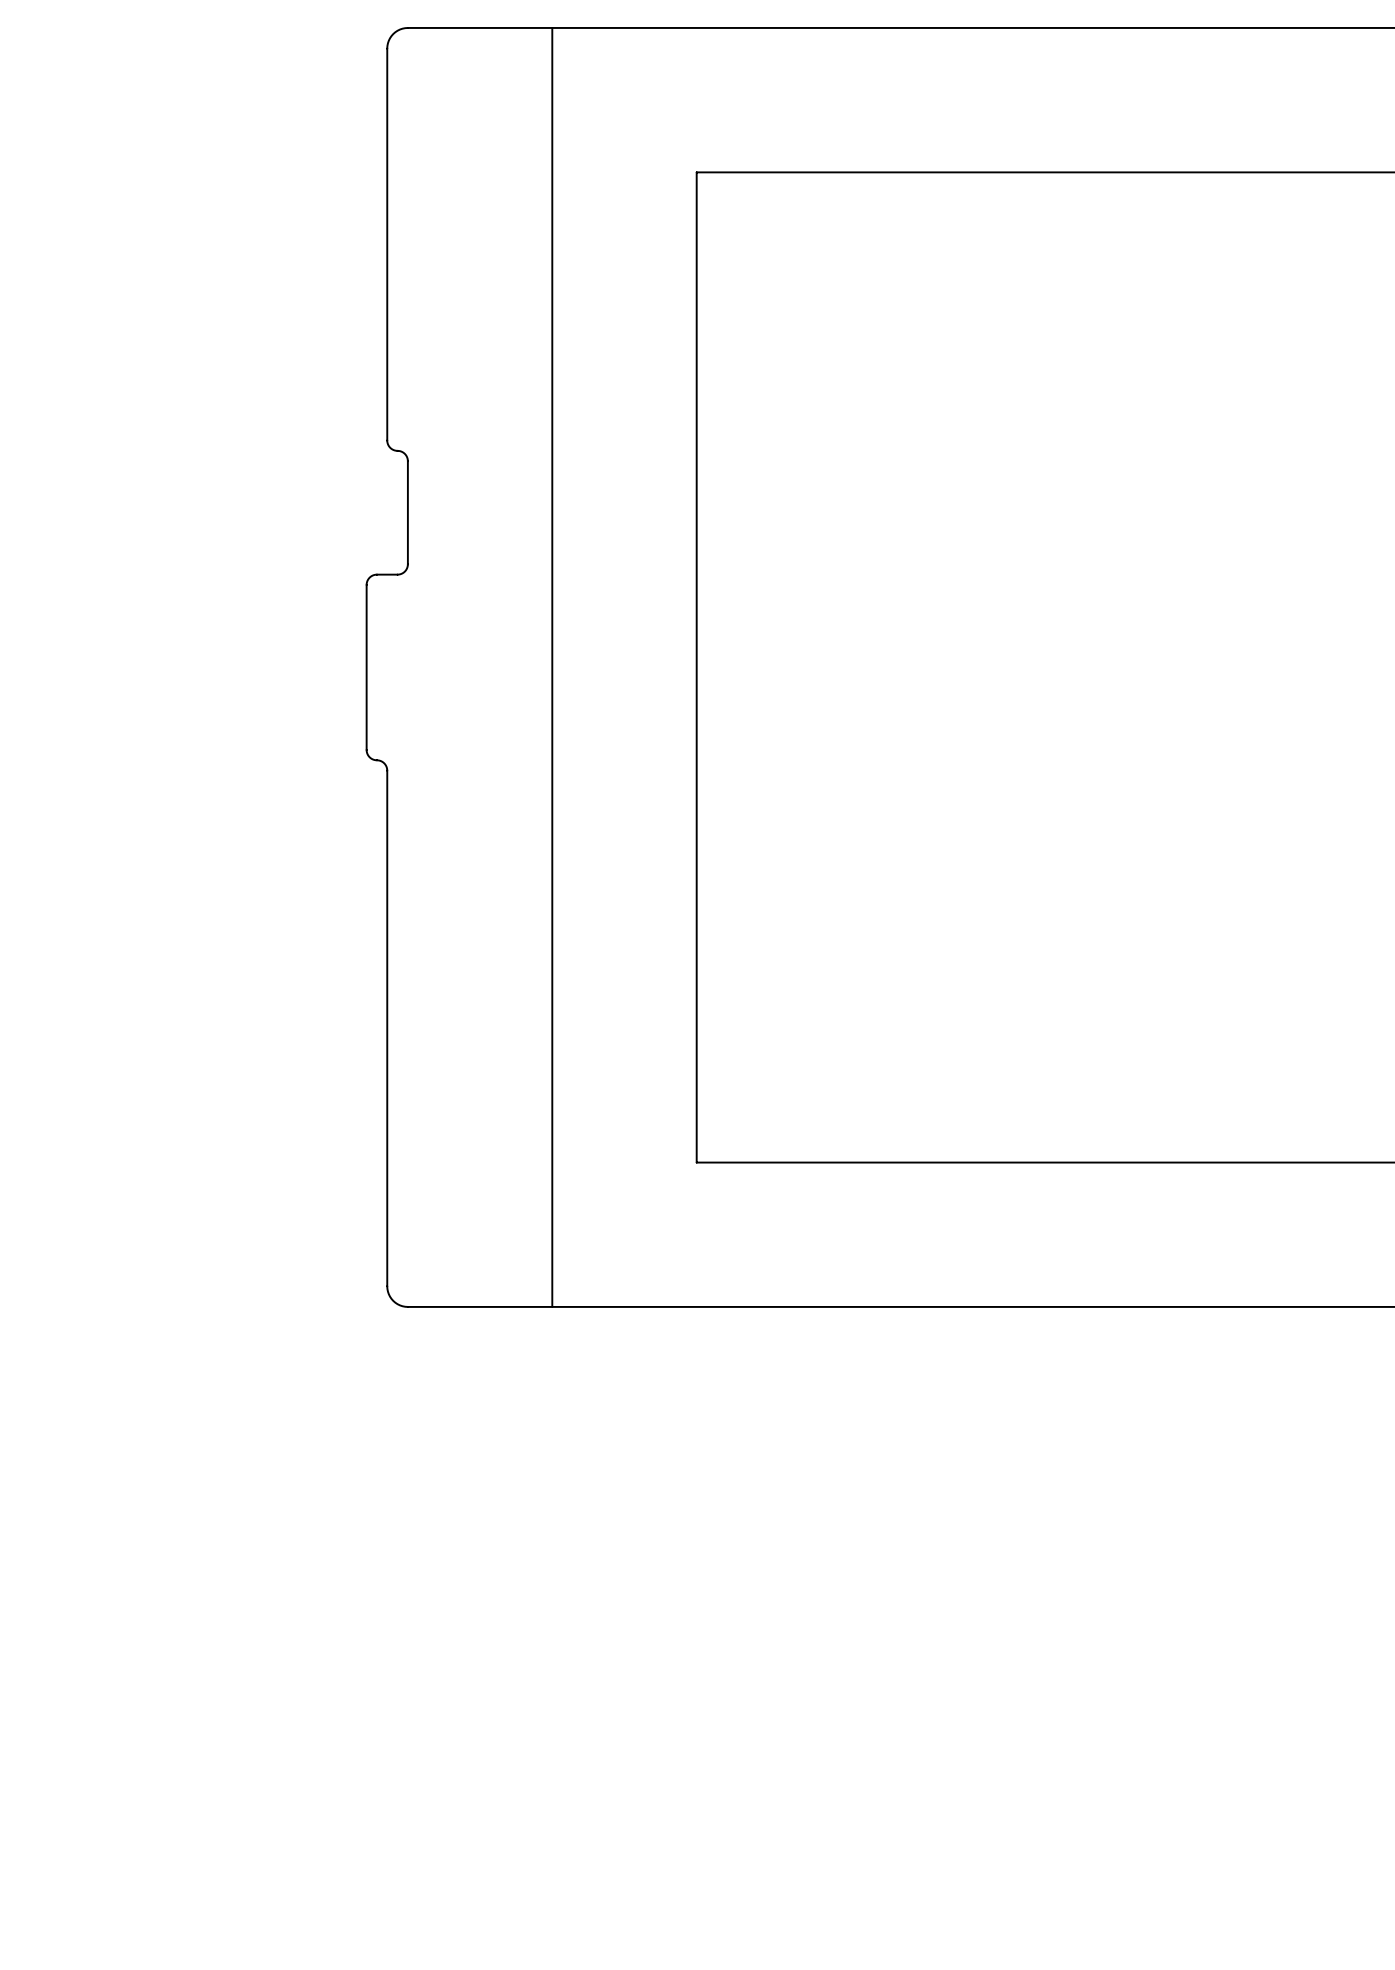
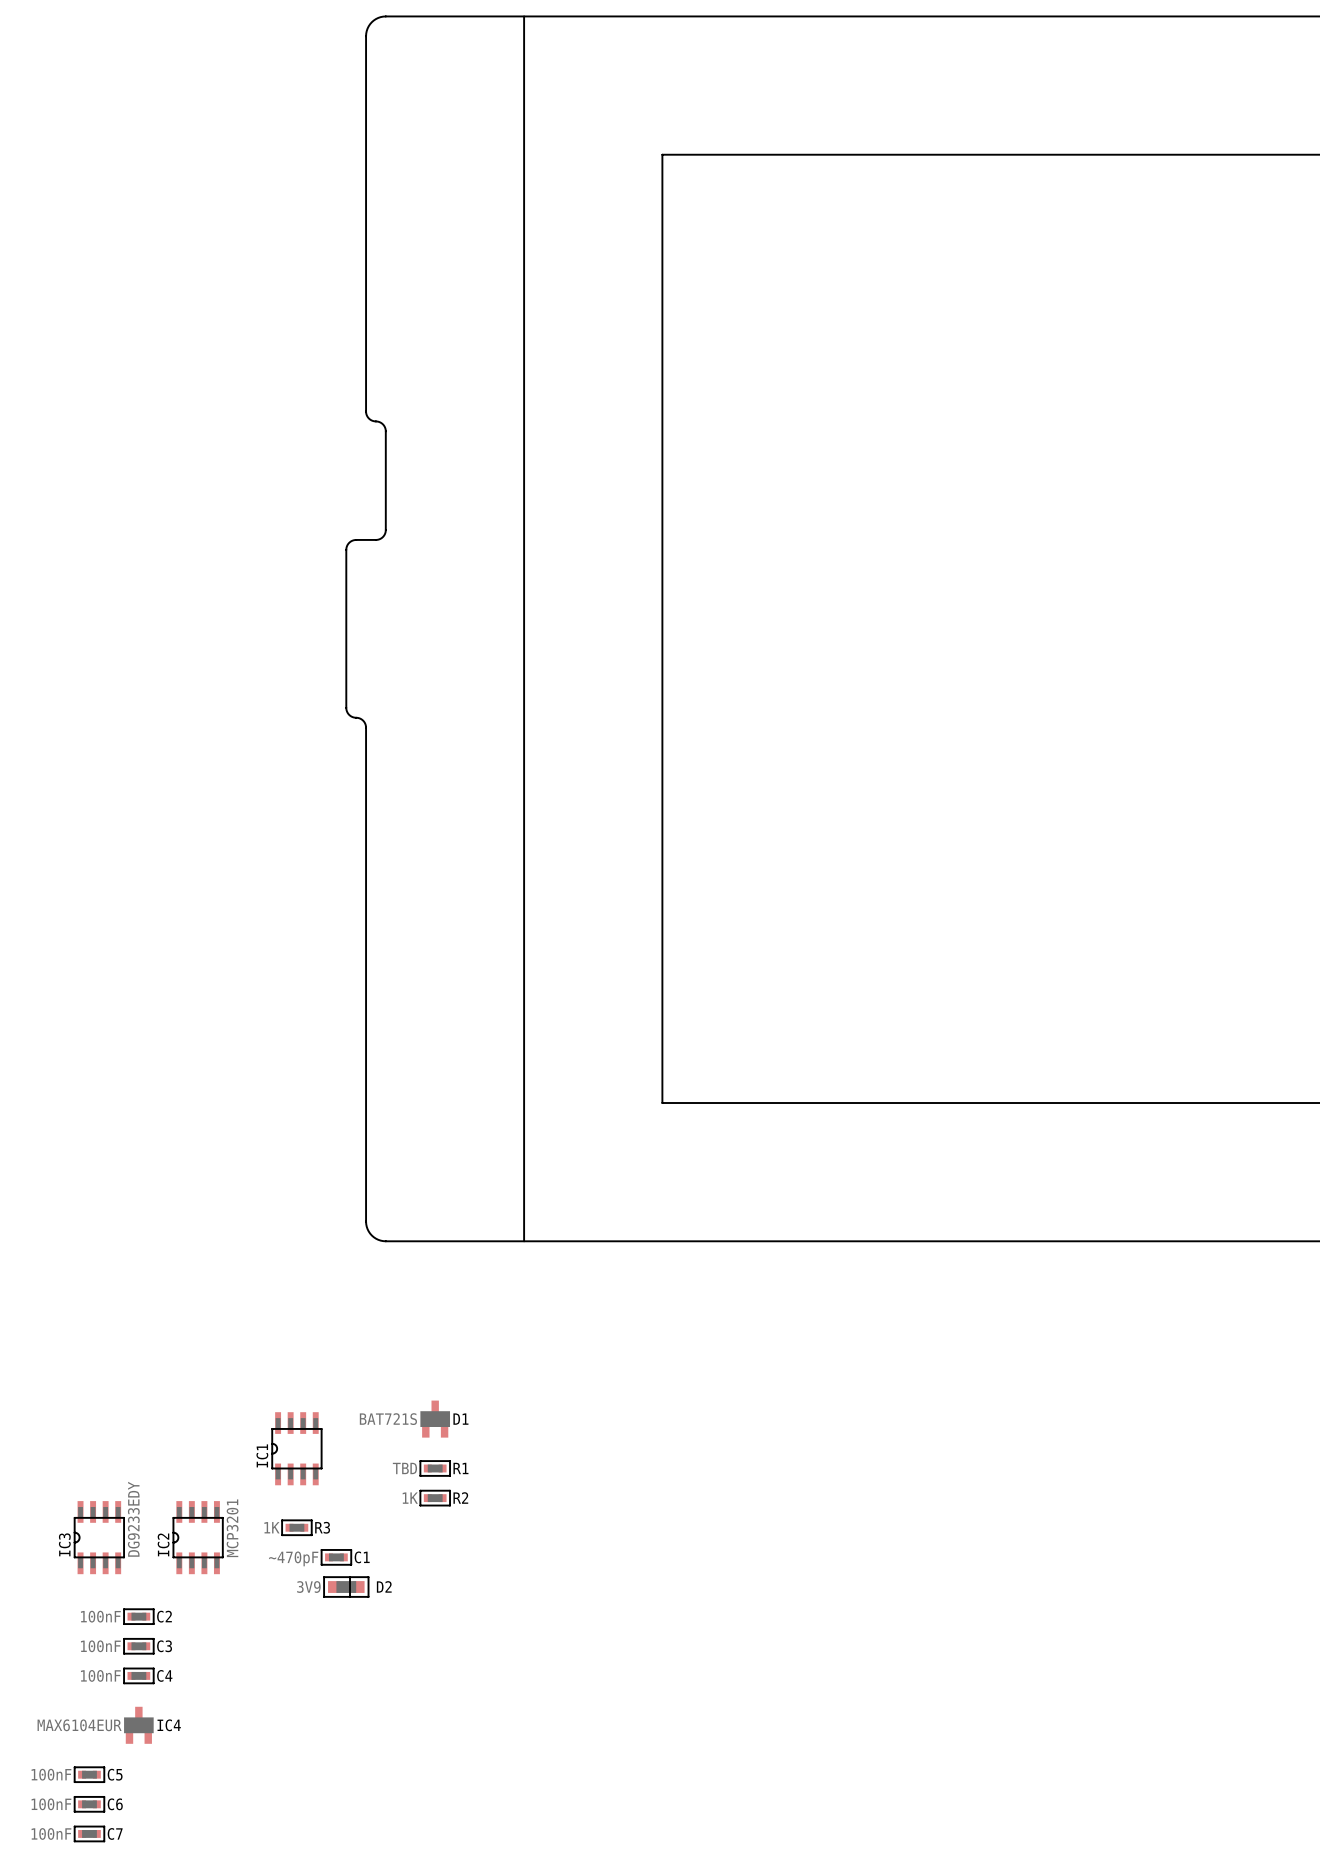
D1: none -> BAT721S (435, 1419)
IC1: none -> (296, 1448)
R1: none -> TBD (435, 1468)
R2: none -> 1K (435, 1498)
R3: none -> 1K (296, 1527)
IC3: none -> DG9233EDY (99, 1537)
IC2: none -> MCP3201 (198, 1537)
C1: none -> ~470pF (336, 1557)
D2: none -> 3V9 (346, 1587)
C2: none -> 100nF (138, 1616)
C3: none -> 100nF (138, 1646)
C4: none -> 100nF (138, 1675)
IC4: none -> MAX6104EUR (138, 1725)
C5: none -> 100nF (89, 1774)
C6: none -> 100nF (89, 1804)
C7: none -> 100nF (89, 1833)

